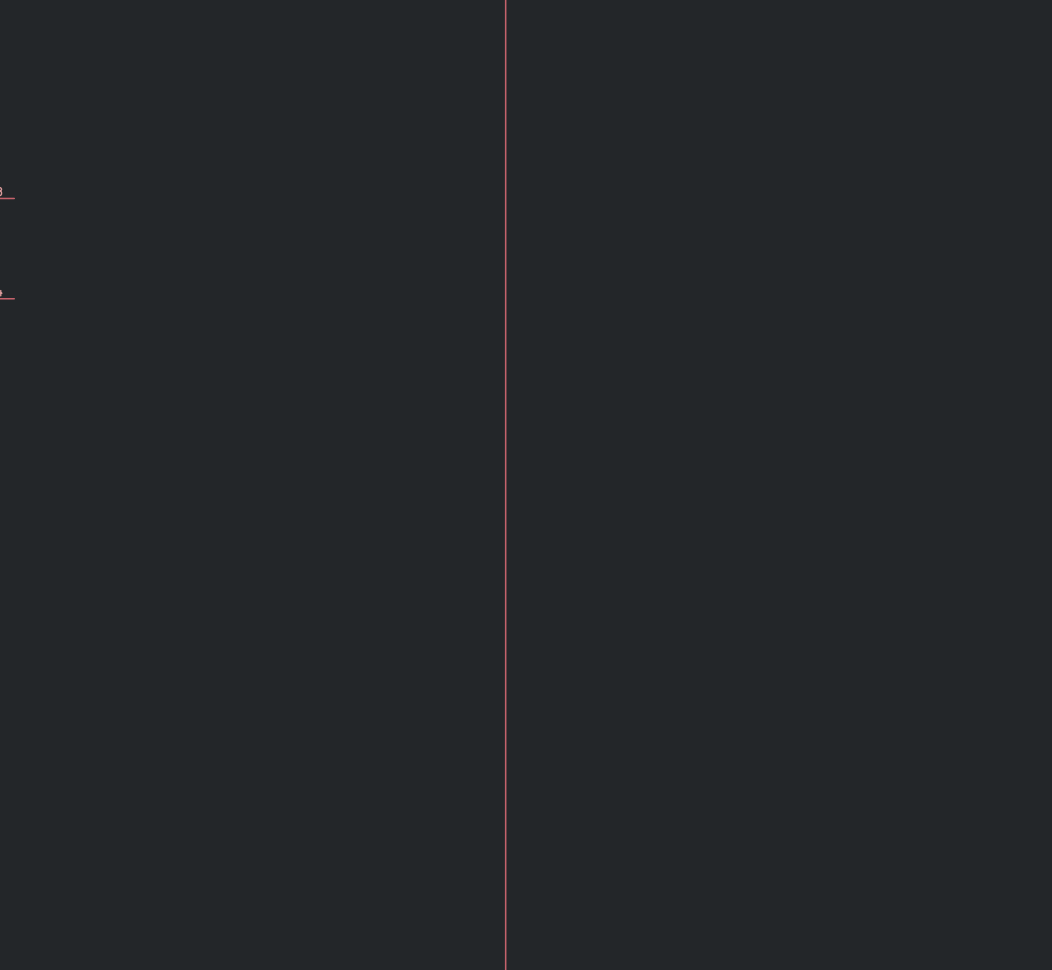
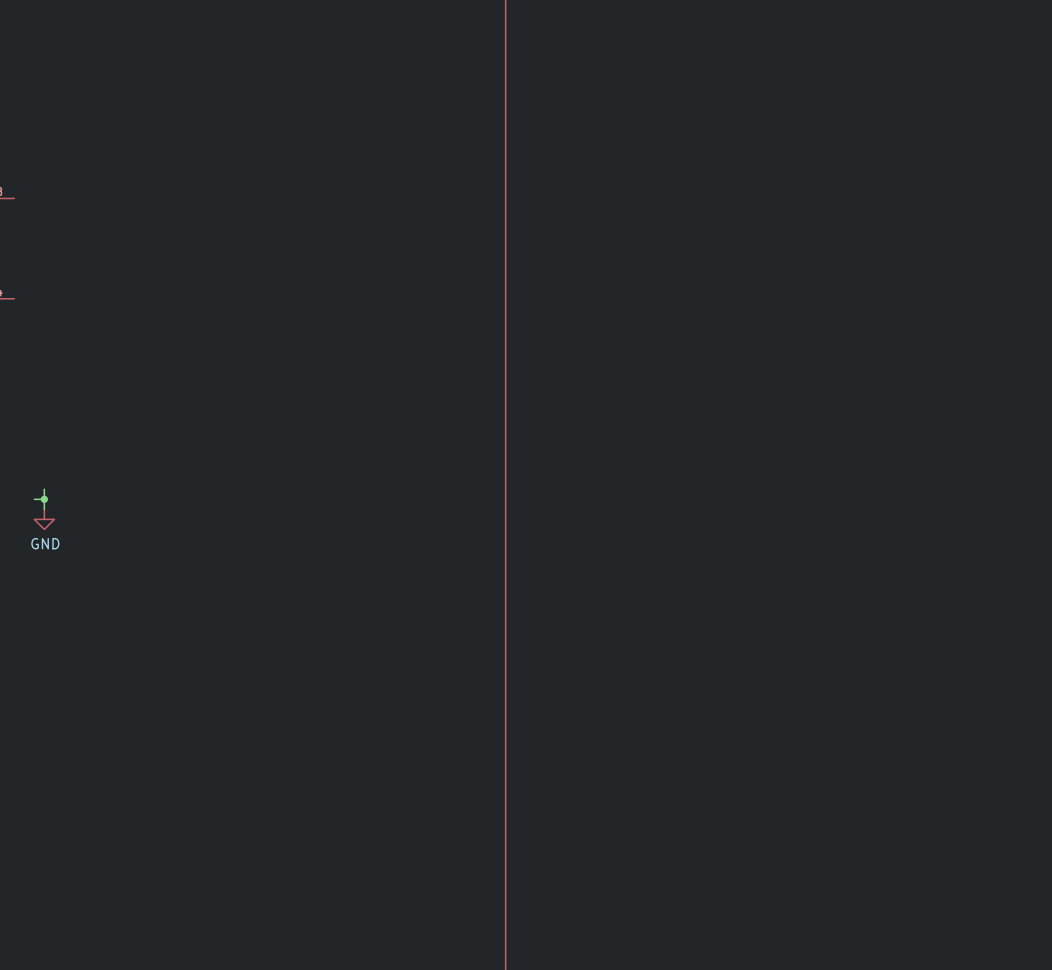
wire: none -> (44, 489) (44, 509)
wire: none -> (34, 499) (44, 499)
junction: none -> (44, 499)
power symbol: none -> GND (44, 519)

